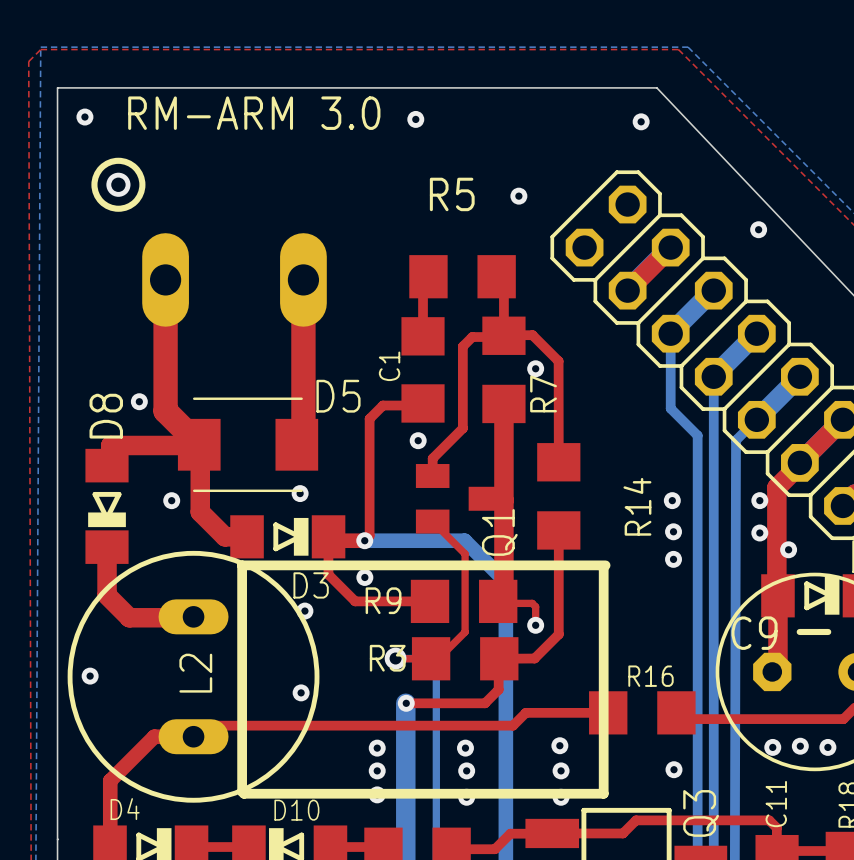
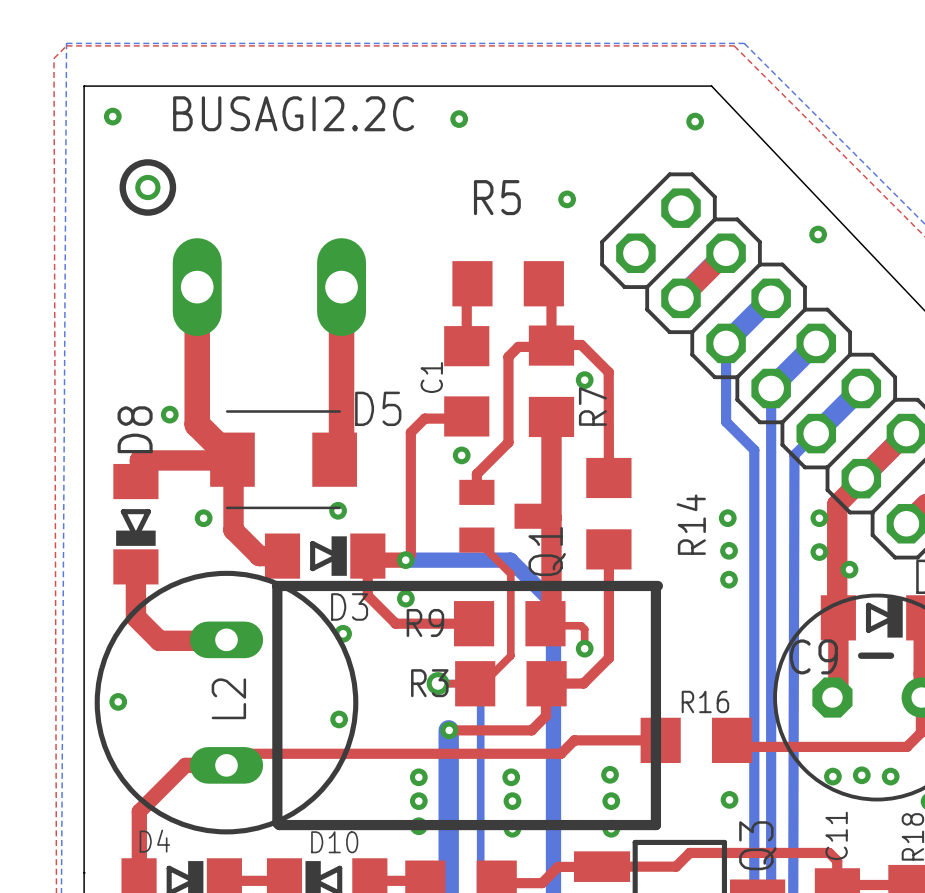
text: RM-ARM 3.0 (254, 113) -> BUSAGI2.2C (293, 113)

